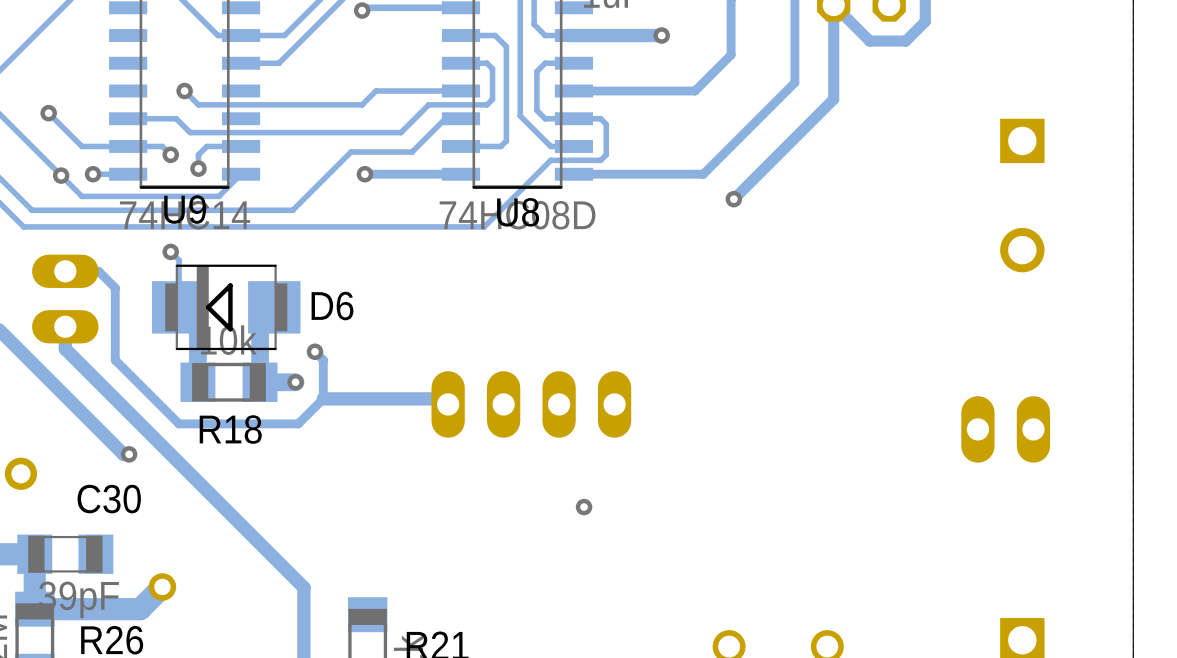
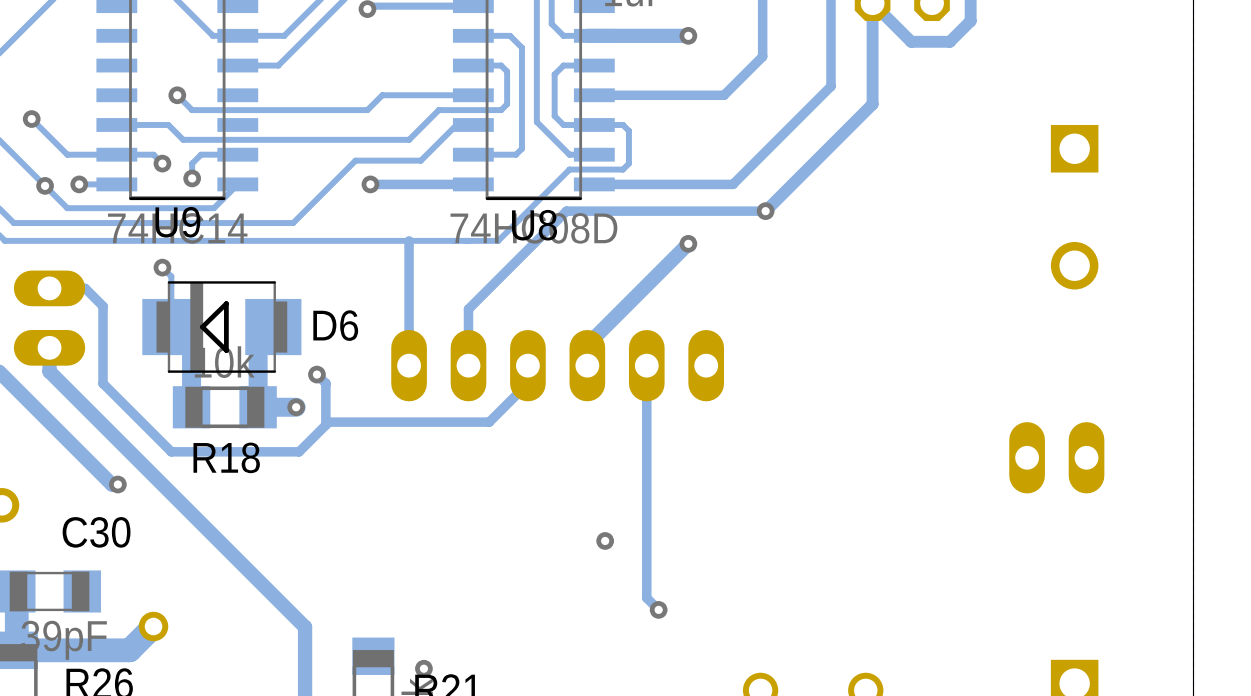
track: none -> (765, 211) (566, 211) (468, 309) (468, 365)
track: none -> (409, 240) (409, 365)
track: none -> (688, 243) (587, 344) (587, 365)
via: none -> (688, 243)
part: none -> (557, 365)
track: none -> (646, 365) (646, 598) (658, 609)
track: (323, 398) (442, 398) (448, 404) -> (325, 425) (328, 422) (489, 422) (527, 383) (527, 365)
part: (531, 404) -> none
via: none -> (658, 609)
via: none -> (423, 668)

